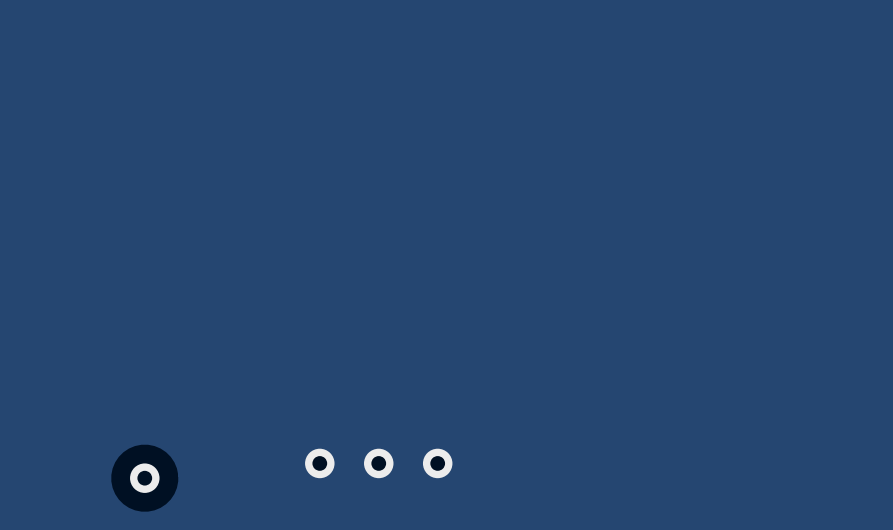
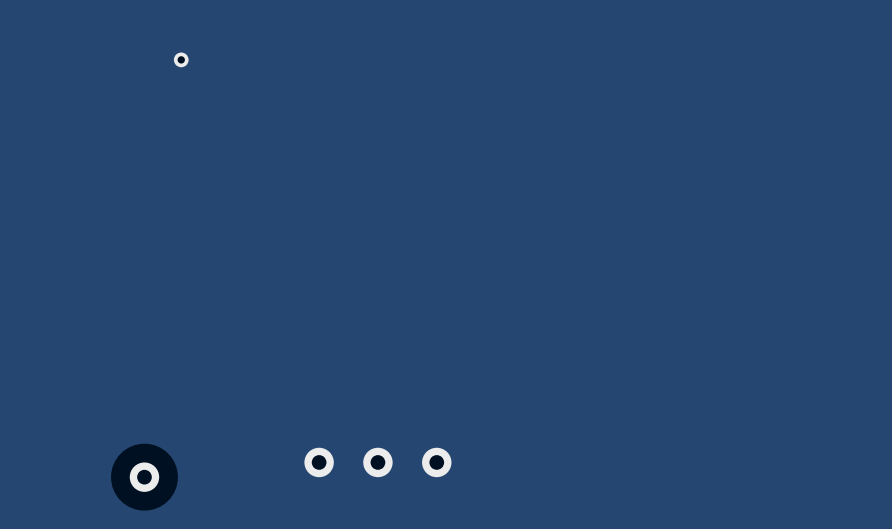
via: none -> (181, 59)

